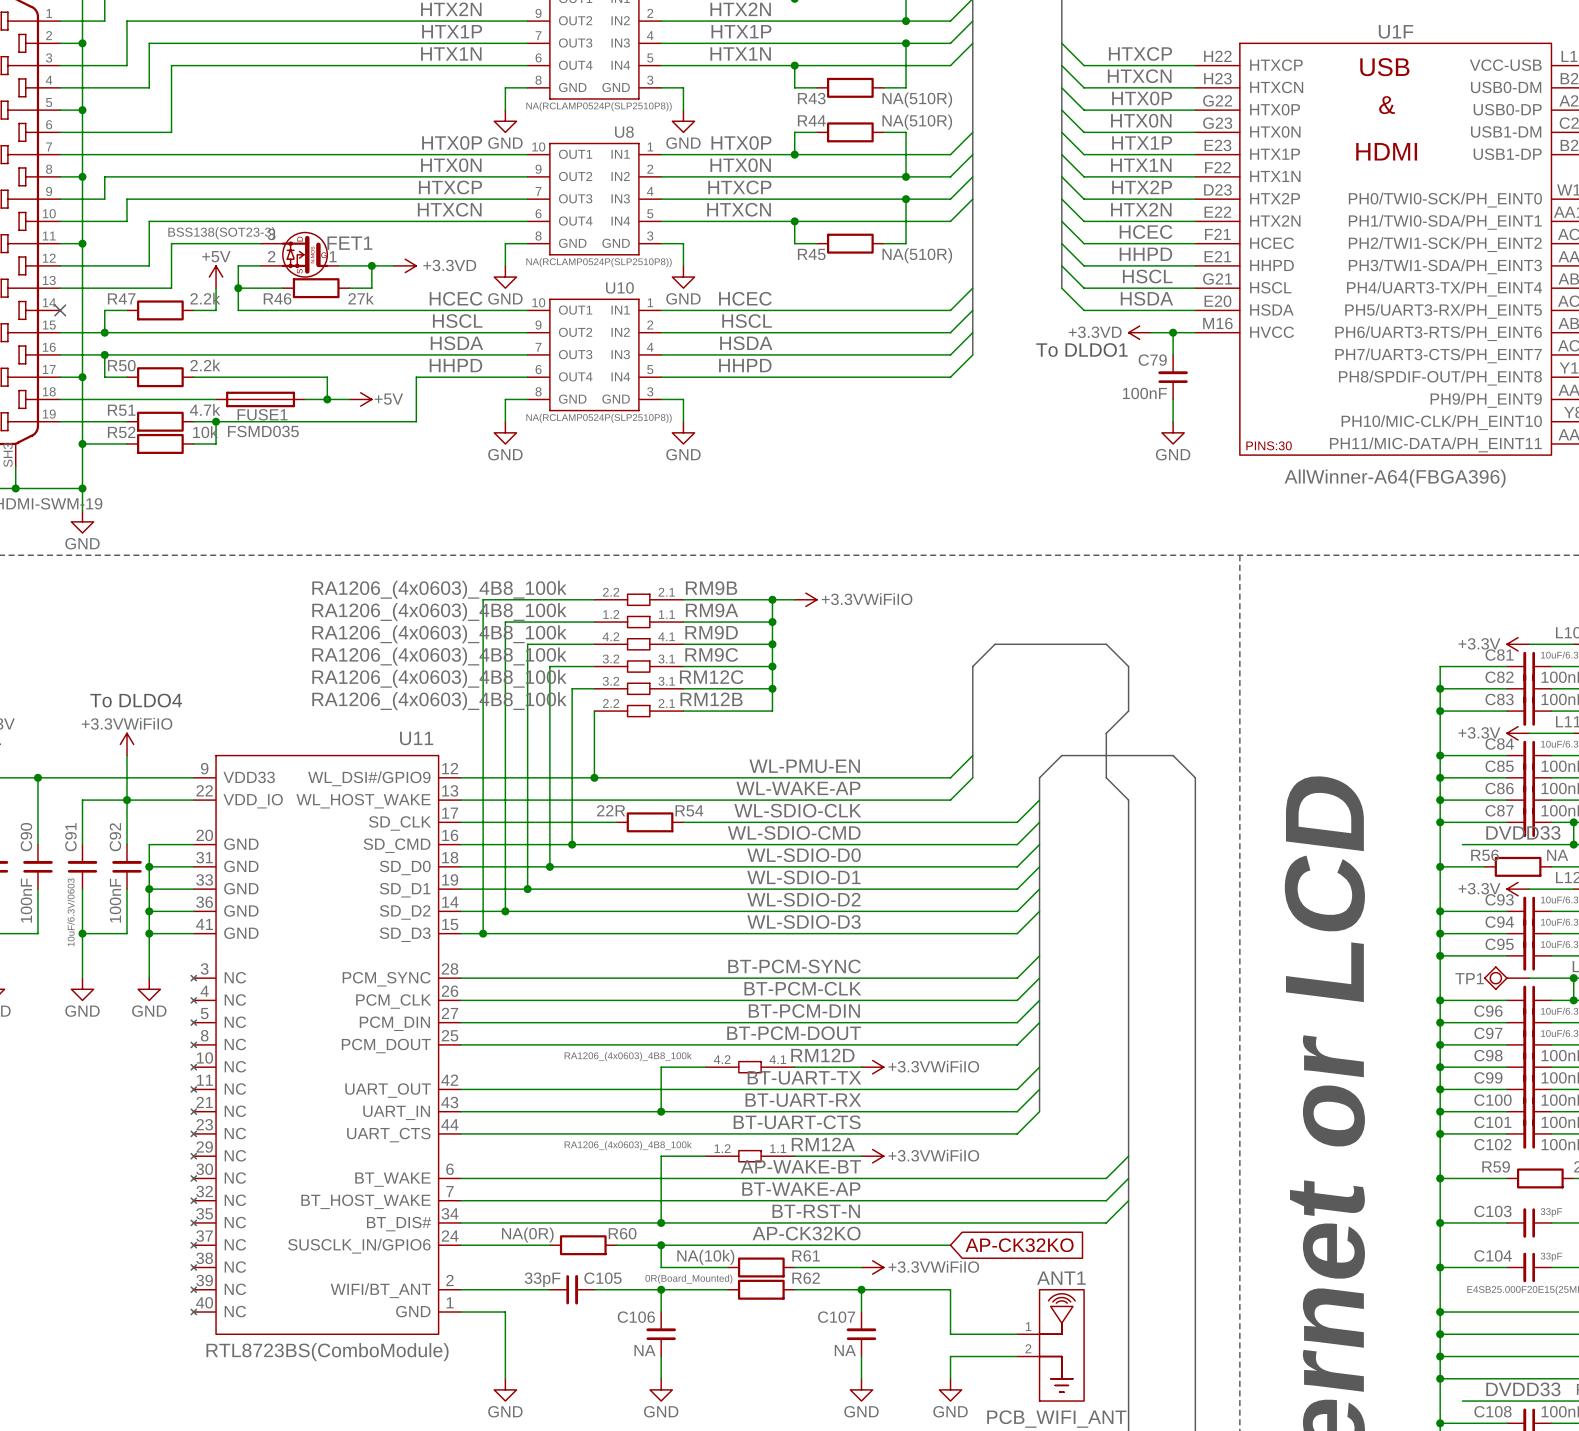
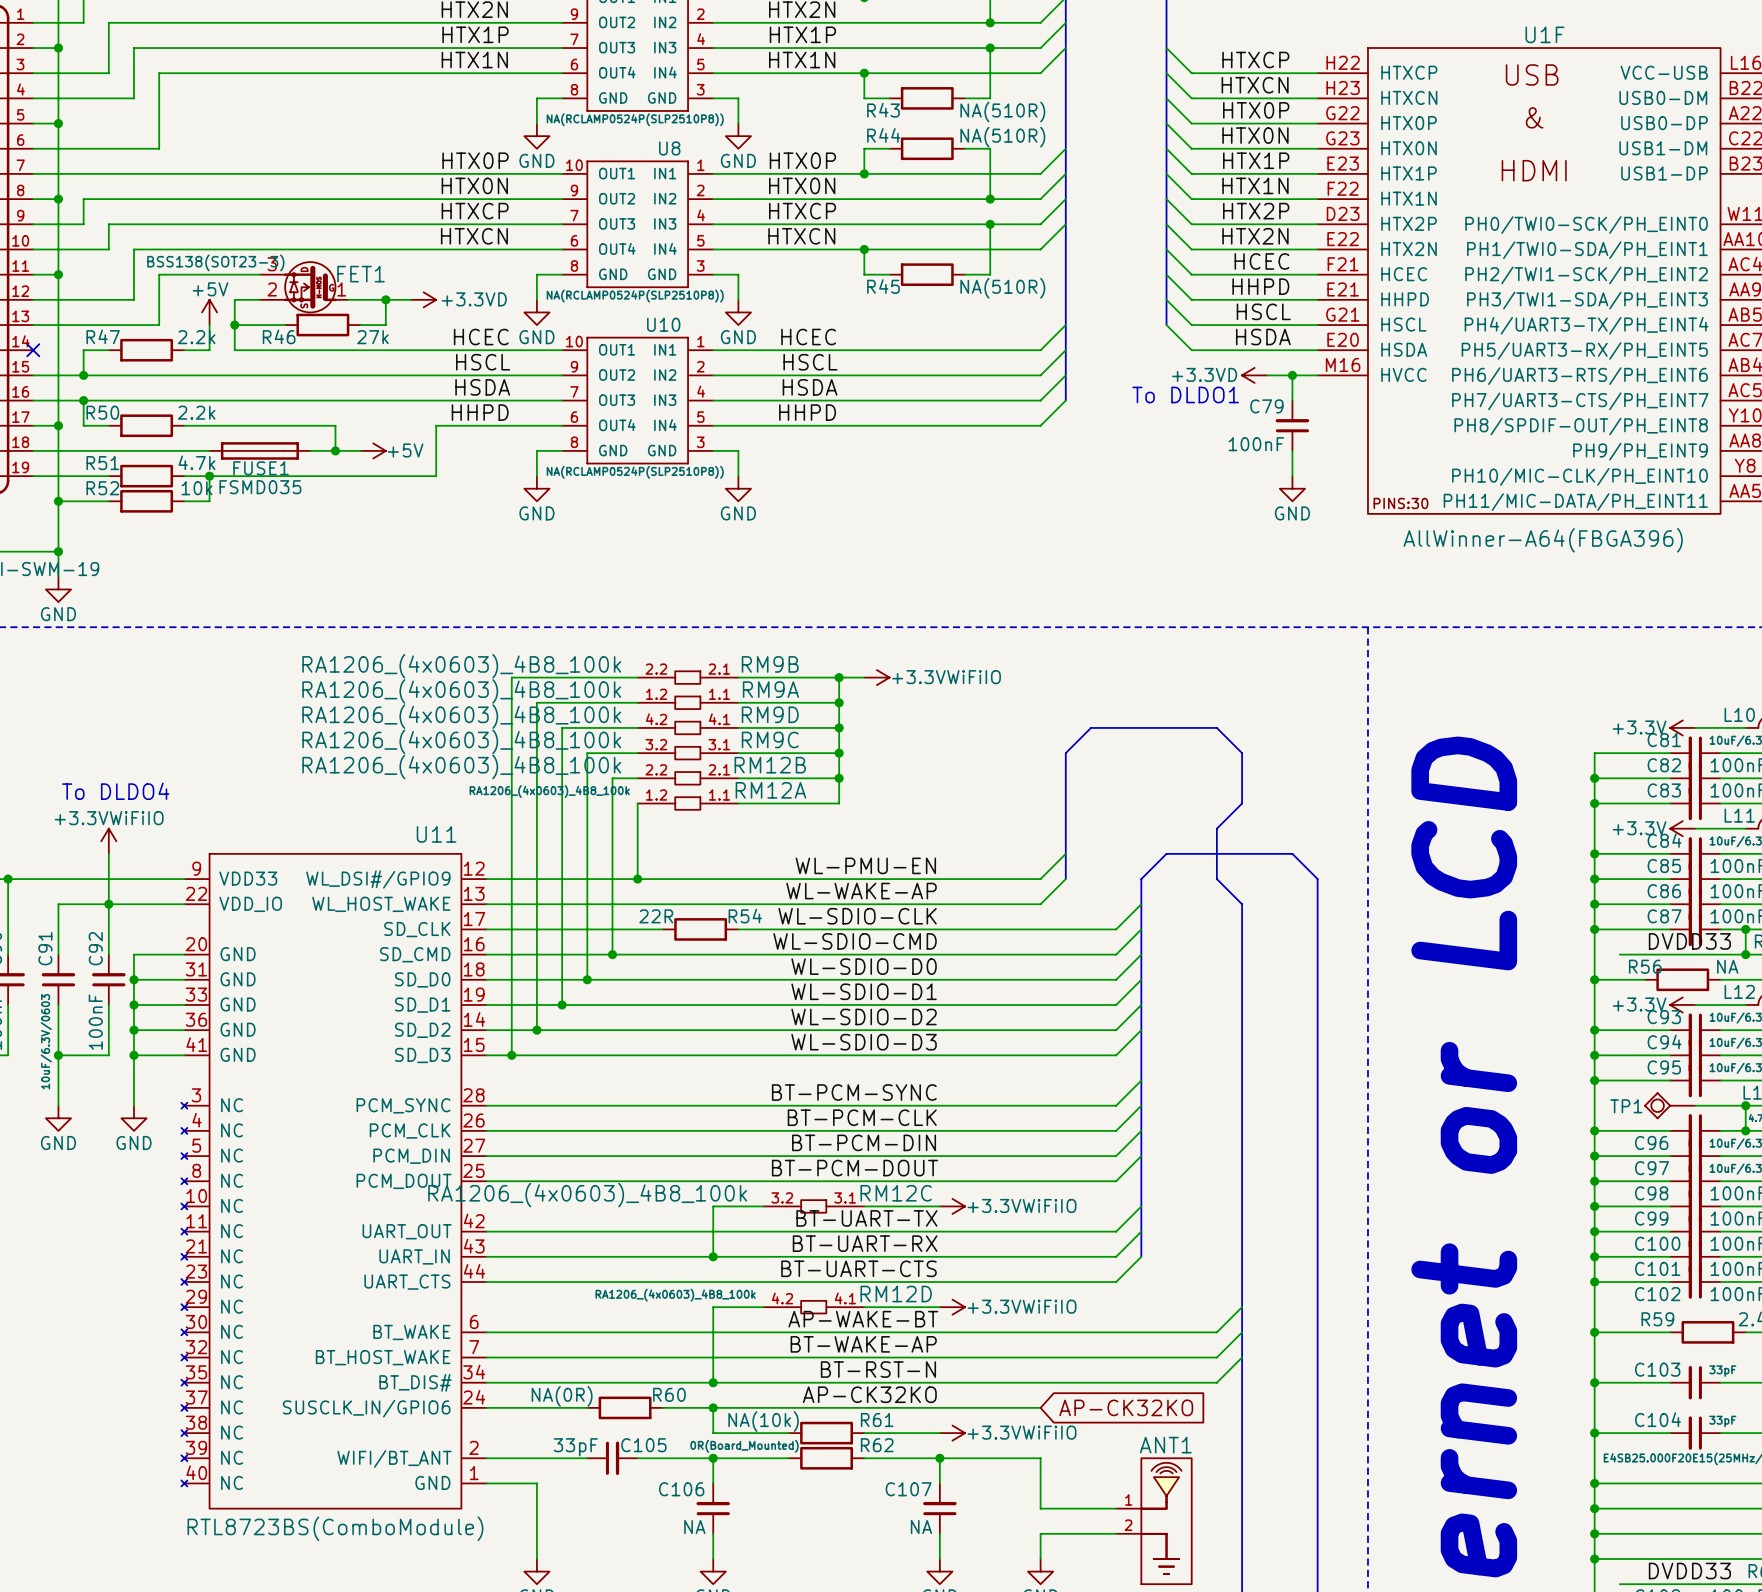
RM12C position: (638, 688) -> (813, 1206)
RM12B position: (638, 711) -> (688, 778)
RM12D position: (750, 1067) -> (813, 1307)
RM12A position: (750, 1156) -> (688, 803)

